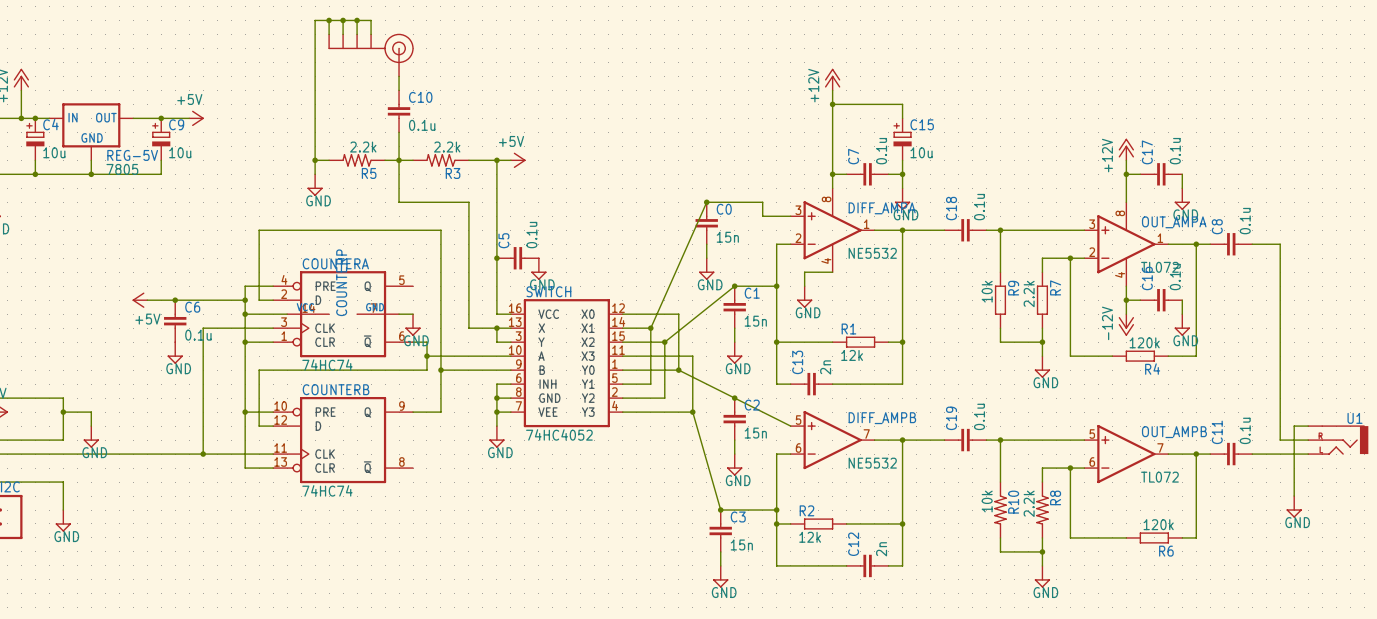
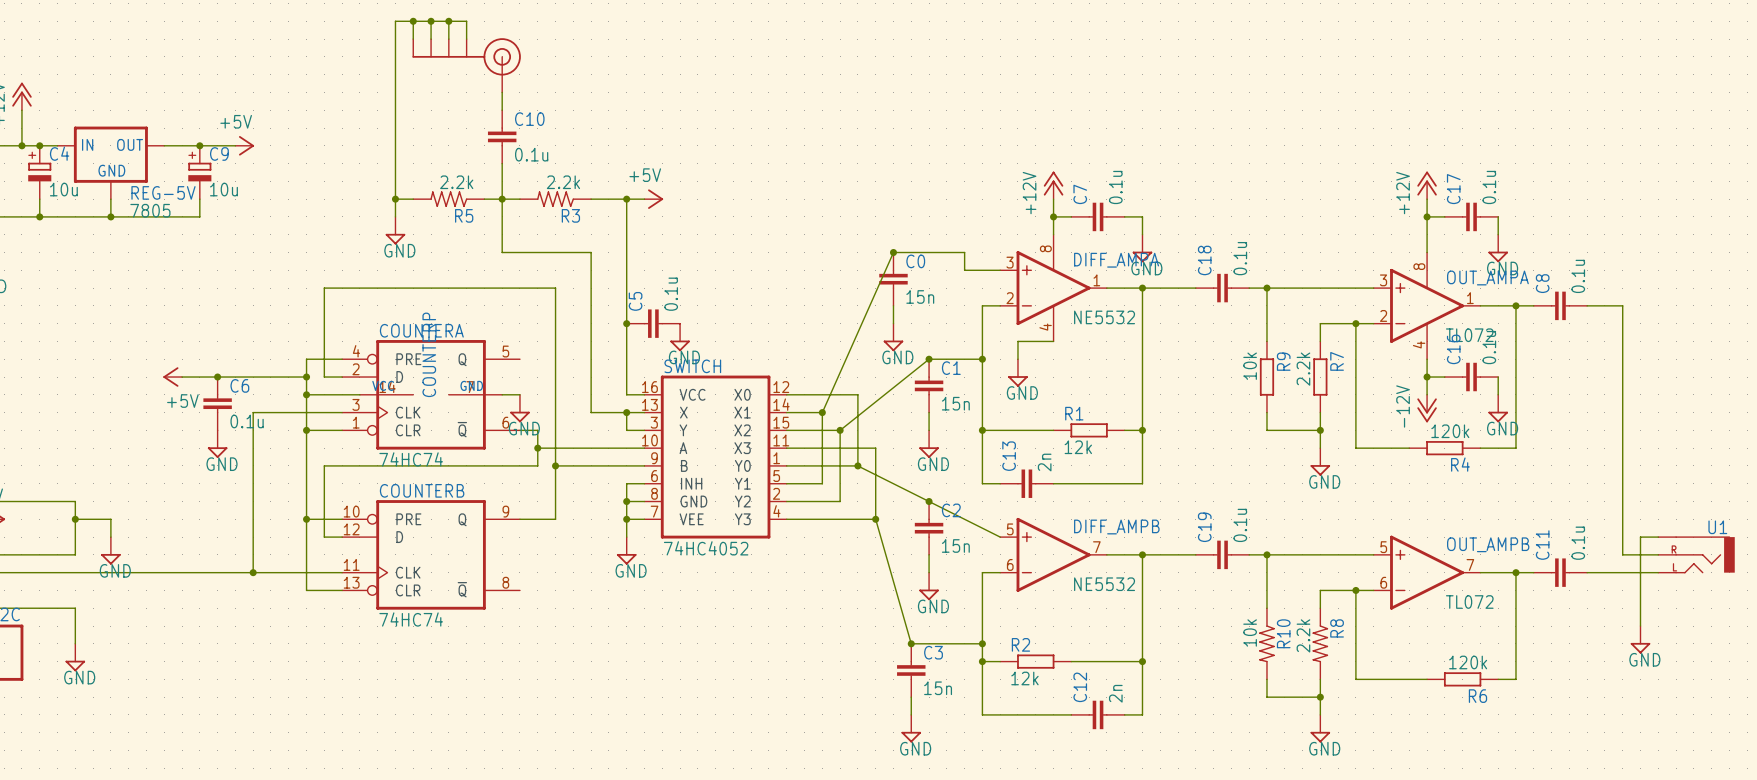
power symbol position: +12V (832, 79) -> +12V (1053, 185)
wire: (832, 90) (832, 160) -> none
wire: (832, 104) (902, 104) (902, 118) -> none
junction: (832, 104) -> none
C15: 10u (902, 139) -> none
wire: (902, 160) (902, 174) -> none
junction: (902, 174) -> none

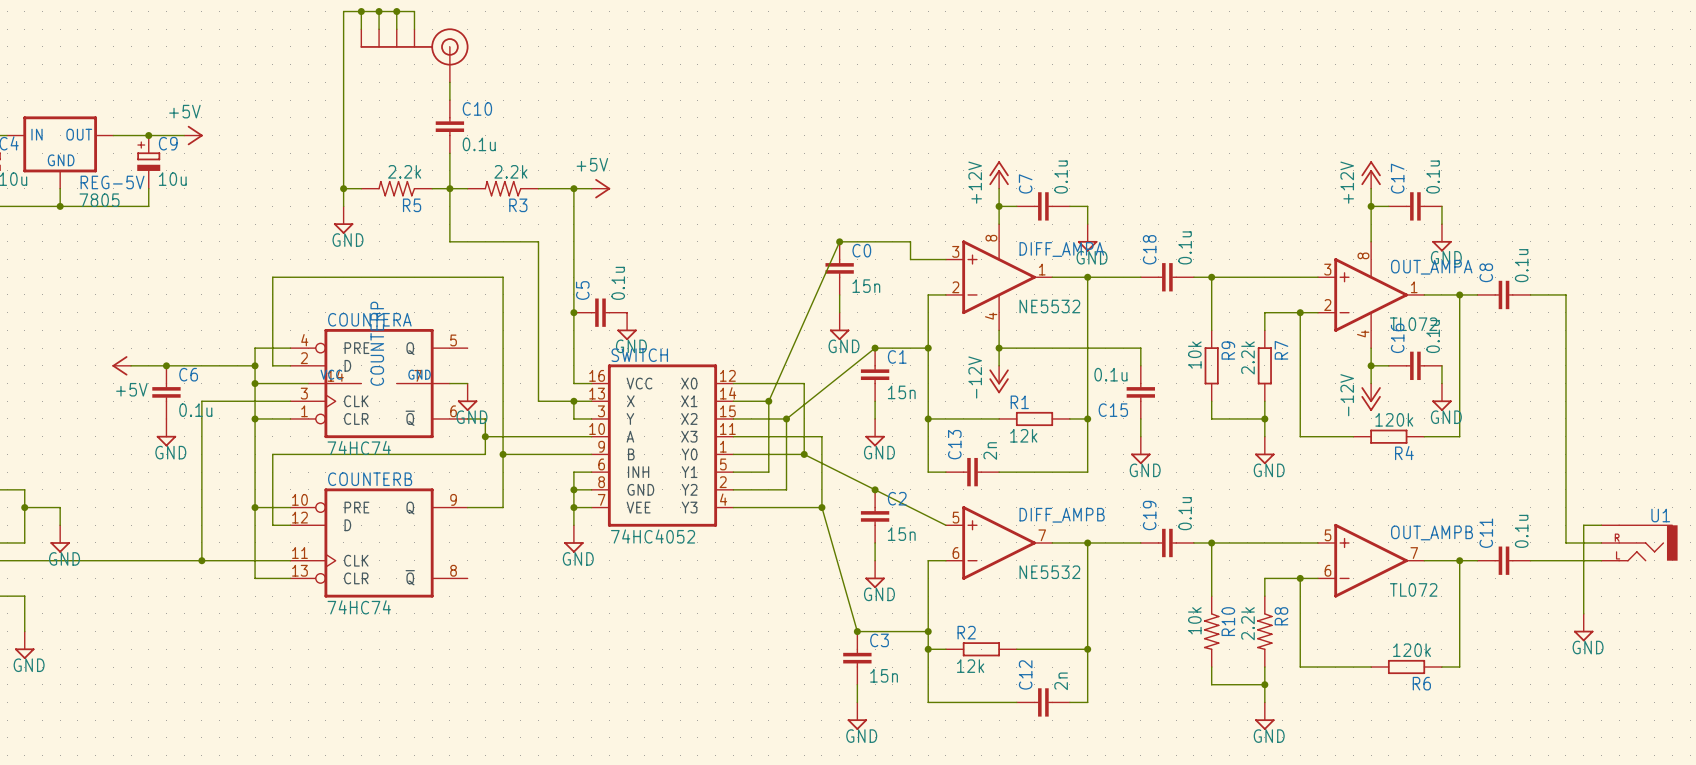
wire: (1053, 341) (1017, 341) (1017, 359) -> (999, 330) (999, 365)
wire: none -> (999, 348) (1140, 348) (1140, 365)
junction: none -> (999, 348)
power symbol: GND (1017, 373) -> none
power symbol: none -> -12V (999, 379)
C15: none -> 0.1u (1140, 392)
wire: none -> (1140, 418) (1140, 436)
power symbol: none -> GND (1140, 450)

